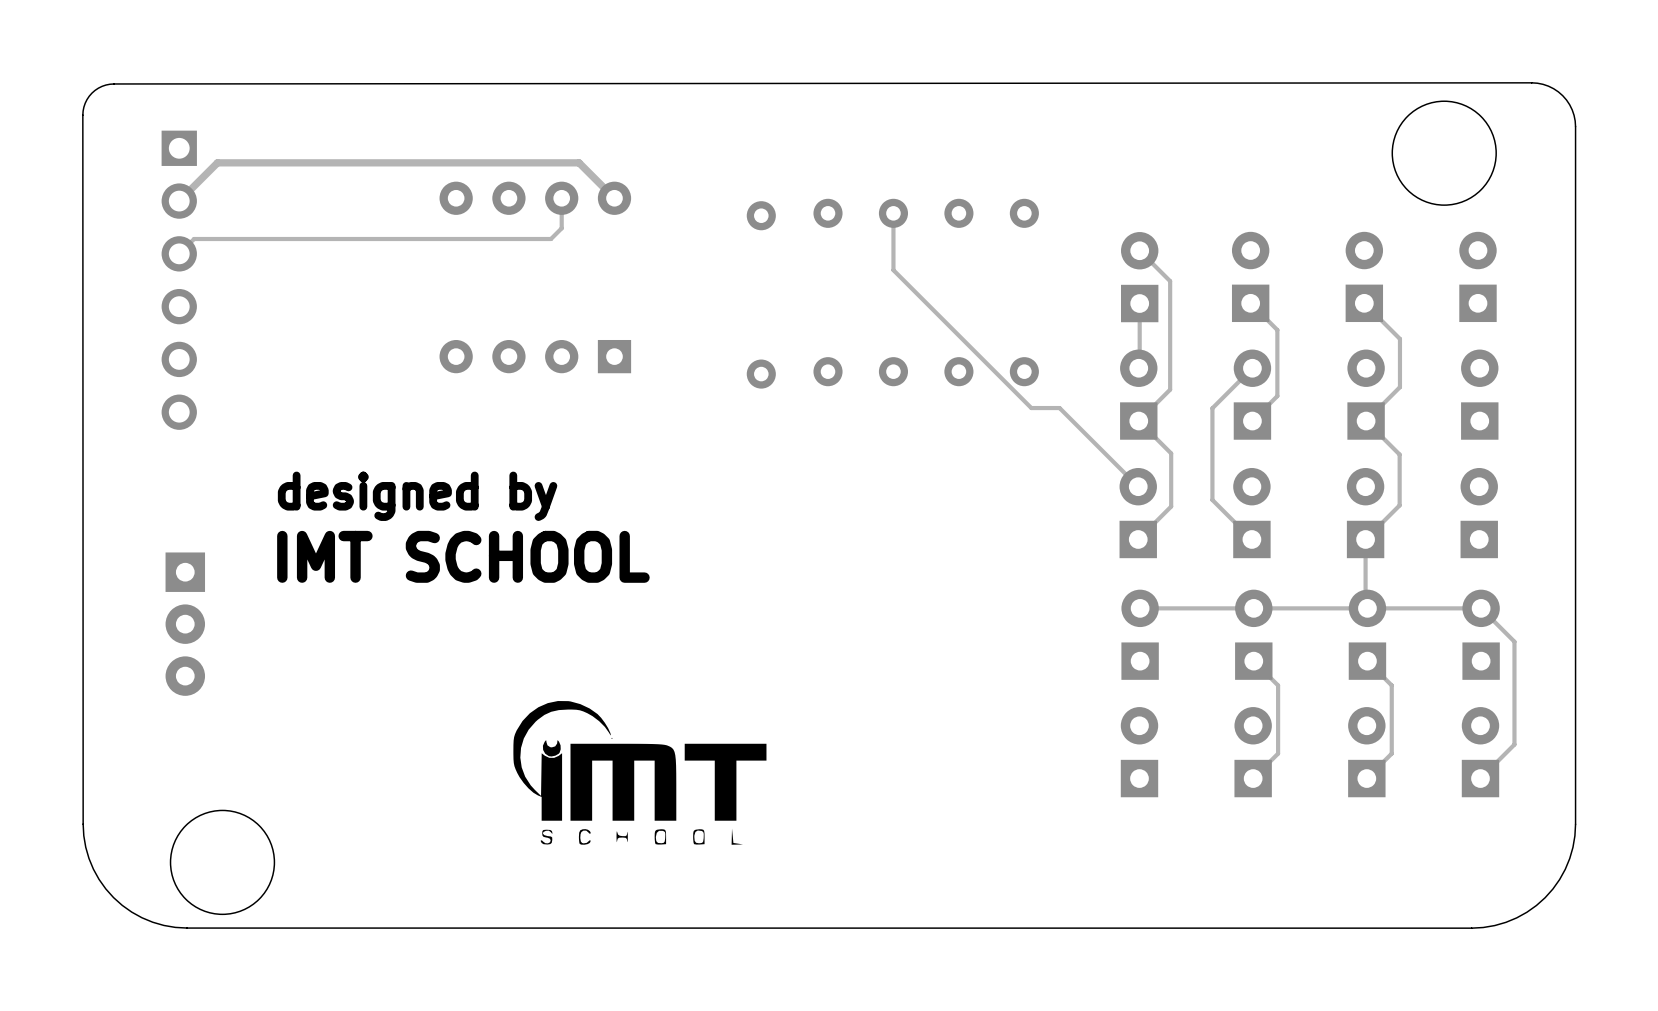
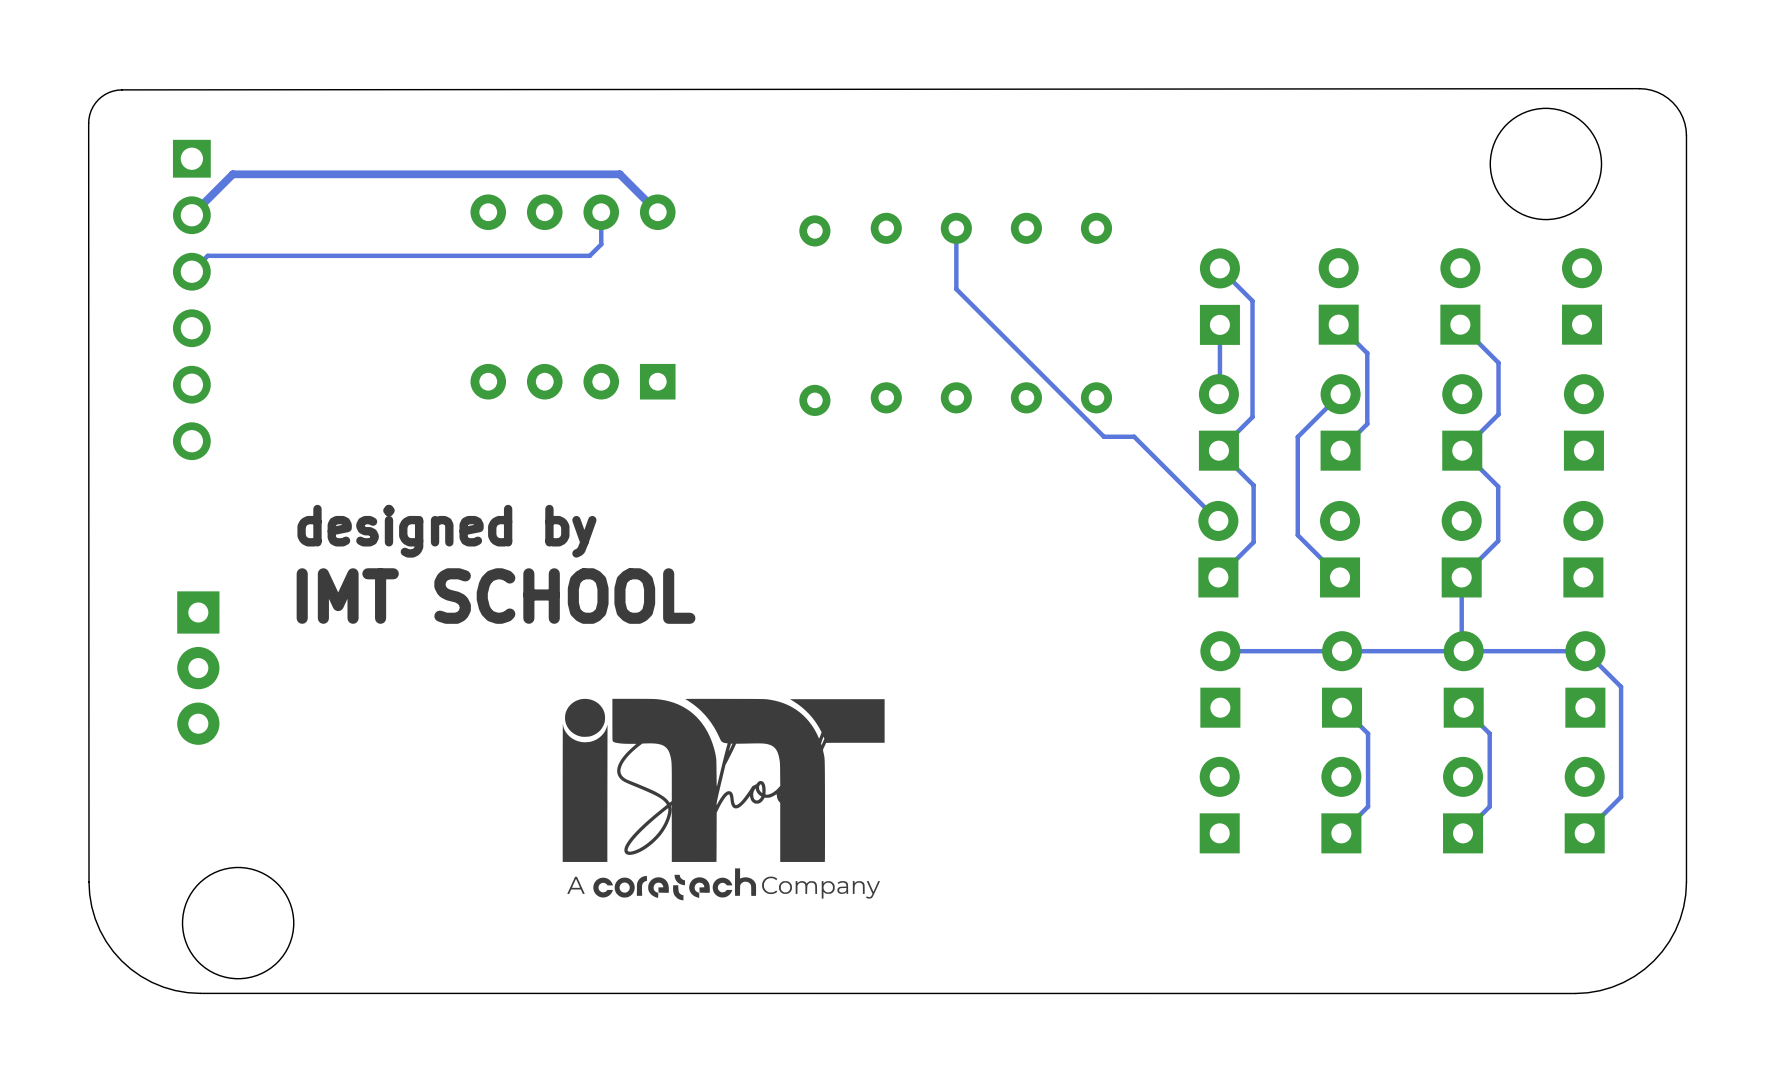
drawing: none -> [562, 698, 885, 901]
drawing: [513, 701, 767, 845] -> none

